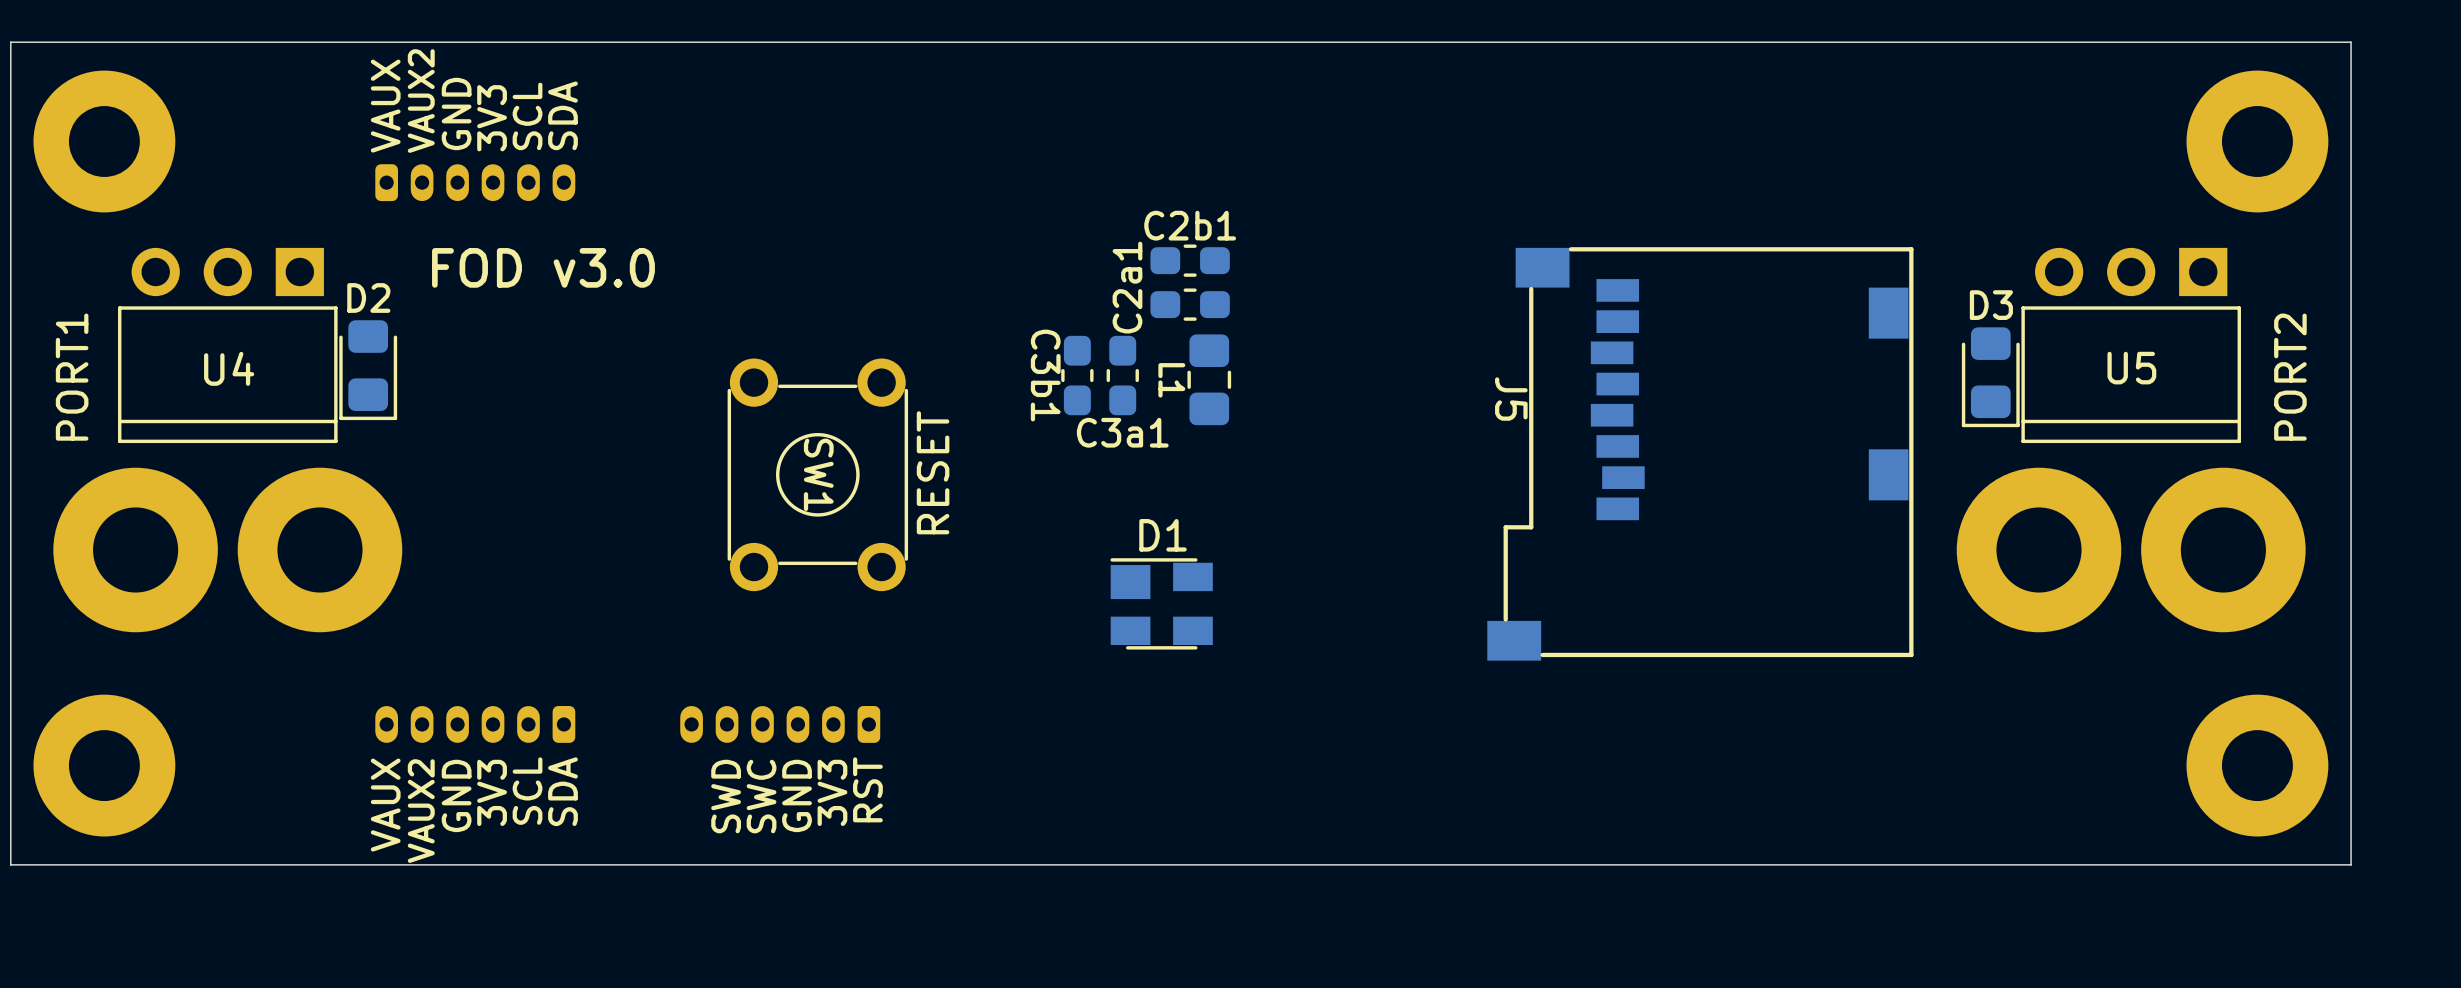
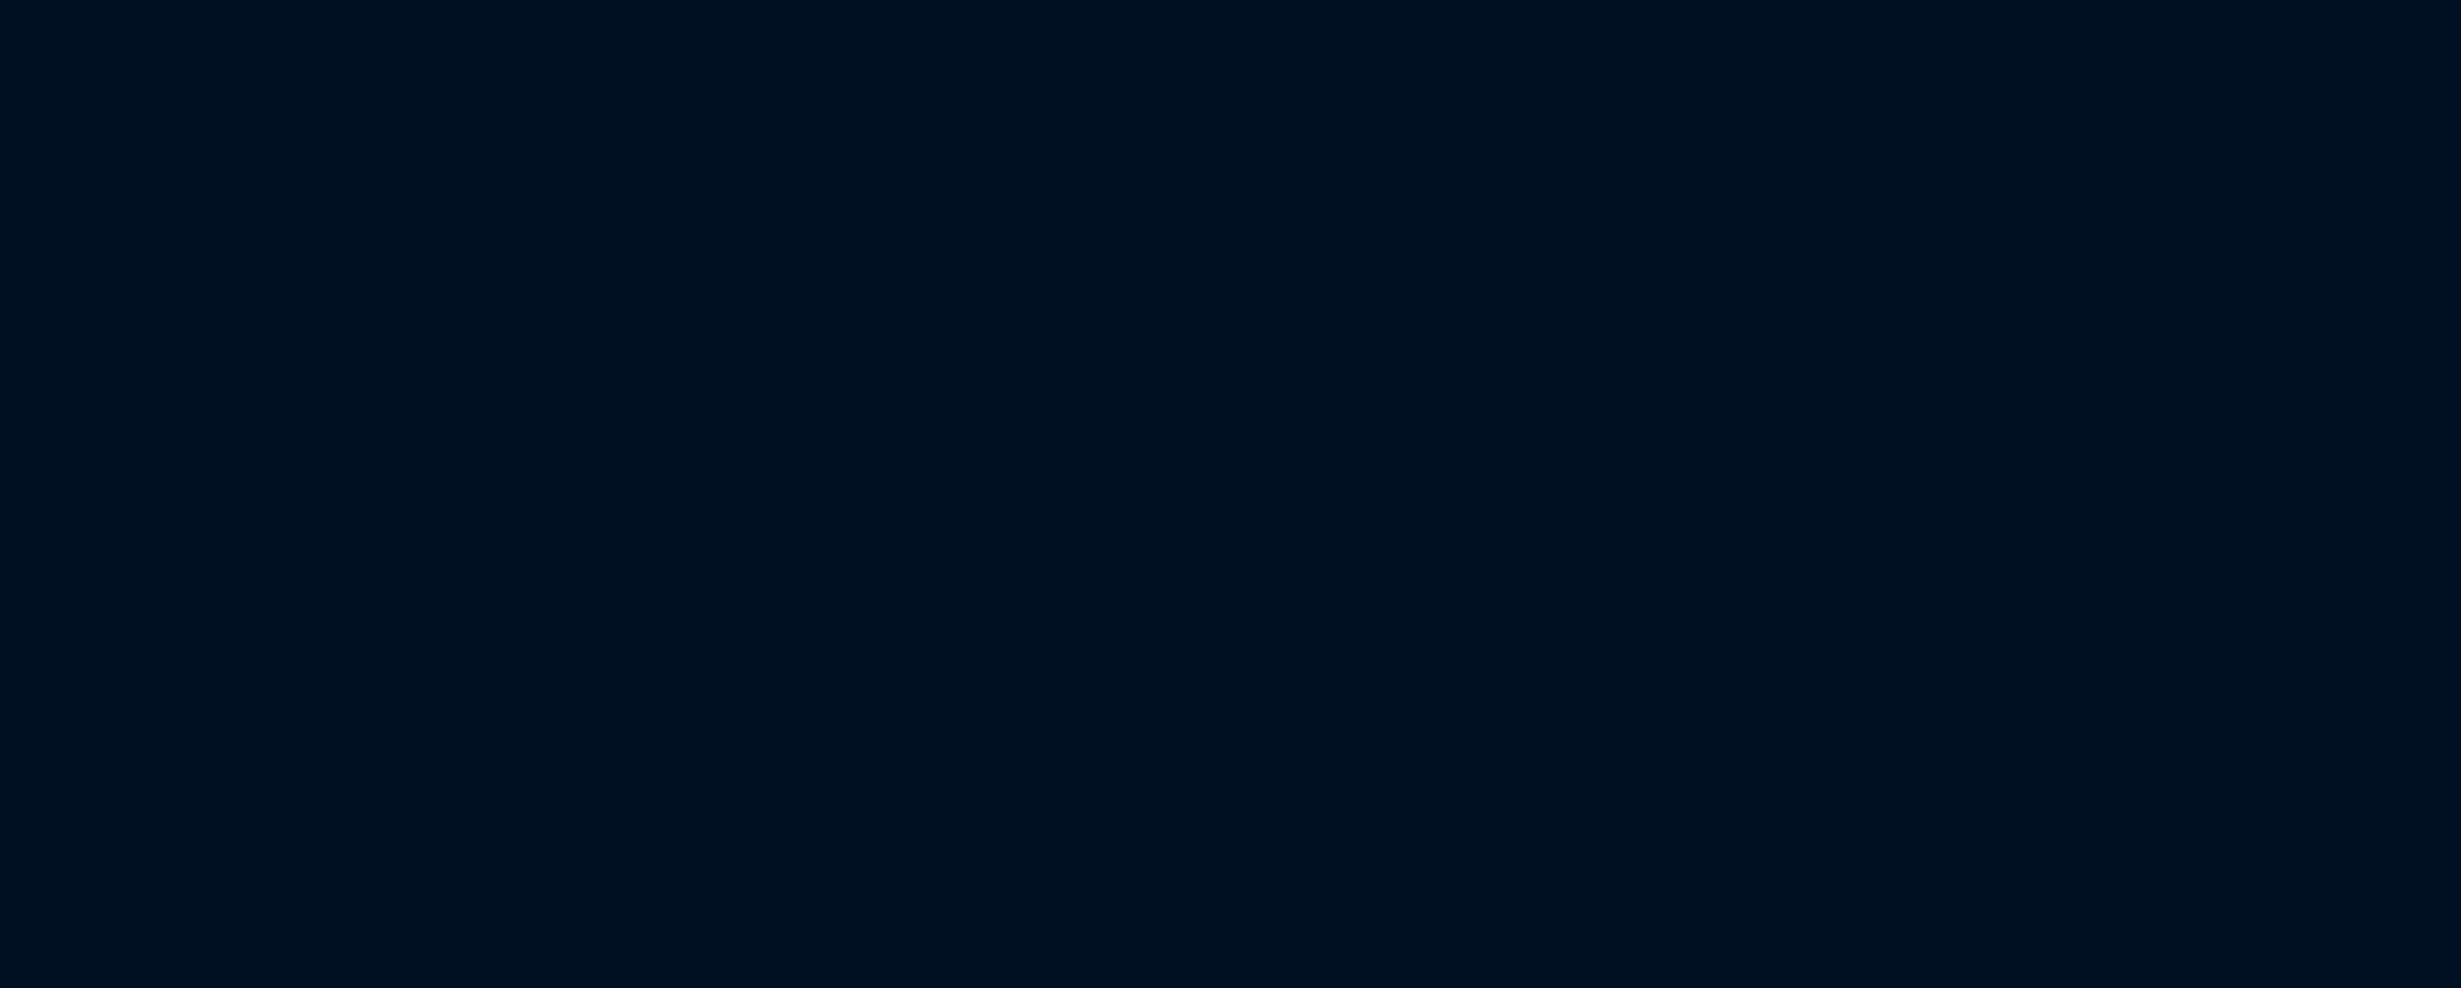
text: VAUX2 (421, 101) -> none
text: VAUX (385, 106) -> none
text: GND (456, 113) -> none
text: SDA (562, 115) -> none
text: SCL (527, 116) -> none
text: 3V3 (492, 118) -> none
part: (475, 182) -> none
C2b1: (1190, 260) -> none
text: FOD v3.0 (543, 267) -> none
C2a1: (1190, 304) -> none
U4: (227, 345) -> none
U5: (2131, 345) -> none
D2: (368, 370) -> none
C3b1: (1077, 375) -> none
C3a1: (1122, 375) -> none
text: PORT1 (72, 377) -> none
D3: (1990, 377) -> none
text: PORT2 (2290, 377) -> none
L1: (1209, 379) -> none
part: (1180, 453) -> none
J5: (1700, 453) -> none
text: RESET (933, 472) -> none
SW1: (817, 474) -> none
D1: (1161, 603) -> none
part: (475, 724) -> none
part: (780, 724) -> none
text: RST (867, 789) -> none
text: SCL (527, 791) -> none
text: SDA (562, 791) -> none
text: 3V3 (492, 792) -> none
text: 3V3 (832, 792) -> none
text: GND (456, 795) -> none
text: GND (797, 795) -> none
text: SWD (726, 796) -> none
text: SWC (761, 796) -> none
text: VAUX (385, 805) -> none
text: VAUX2 (421, 811) -> none

